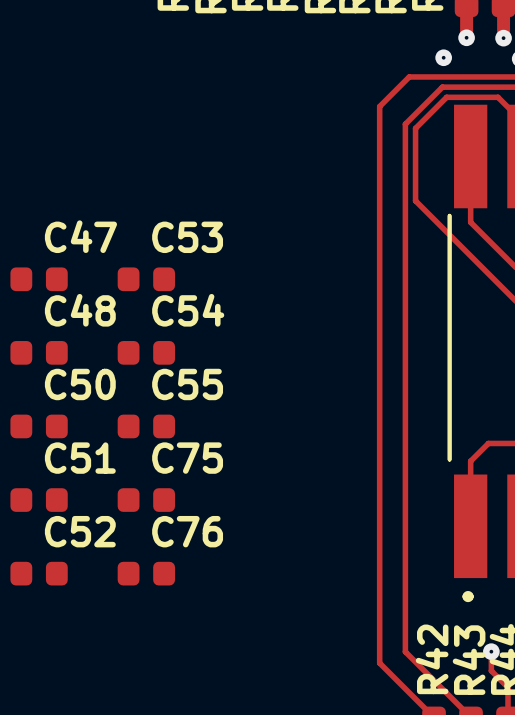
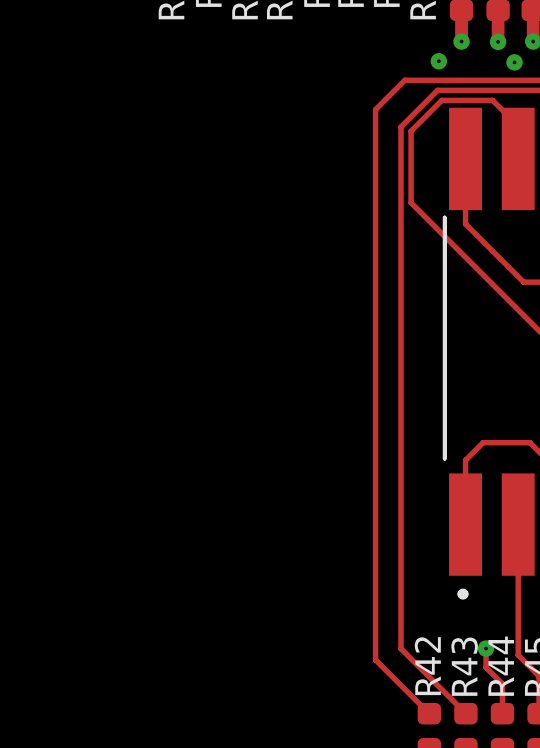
C47: (39, 279) -> none
C53: (146, 279) -> none
C48: (39, 352) -> none
C54: (146, 352) -> none
C50: (39, 426) -> none
C55: (146, 426) -> none
C51: (39, 500) -> none
C75: (146, 500) -> none
C52: (39, 573) -> none
C76: (146, 573) -> none

